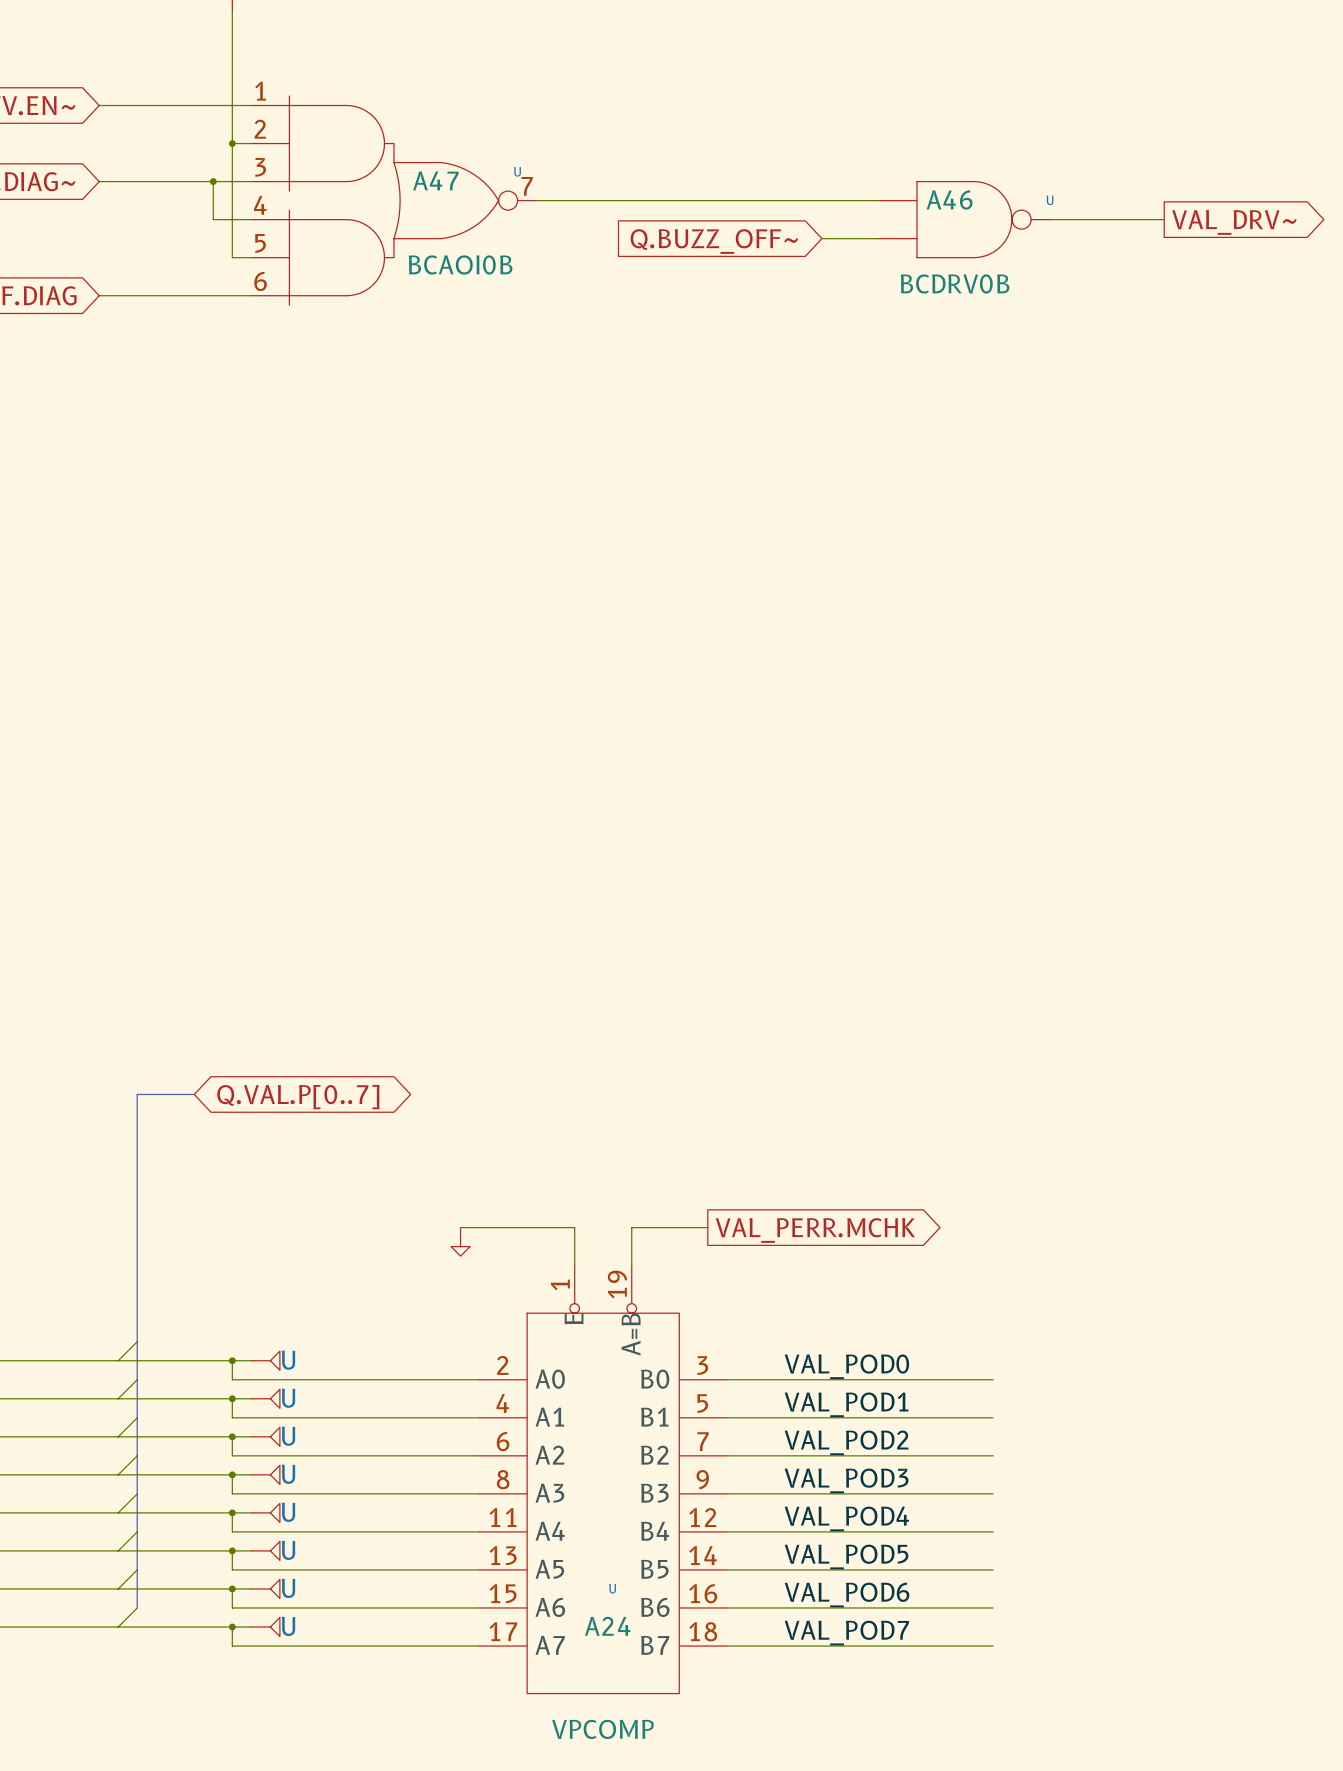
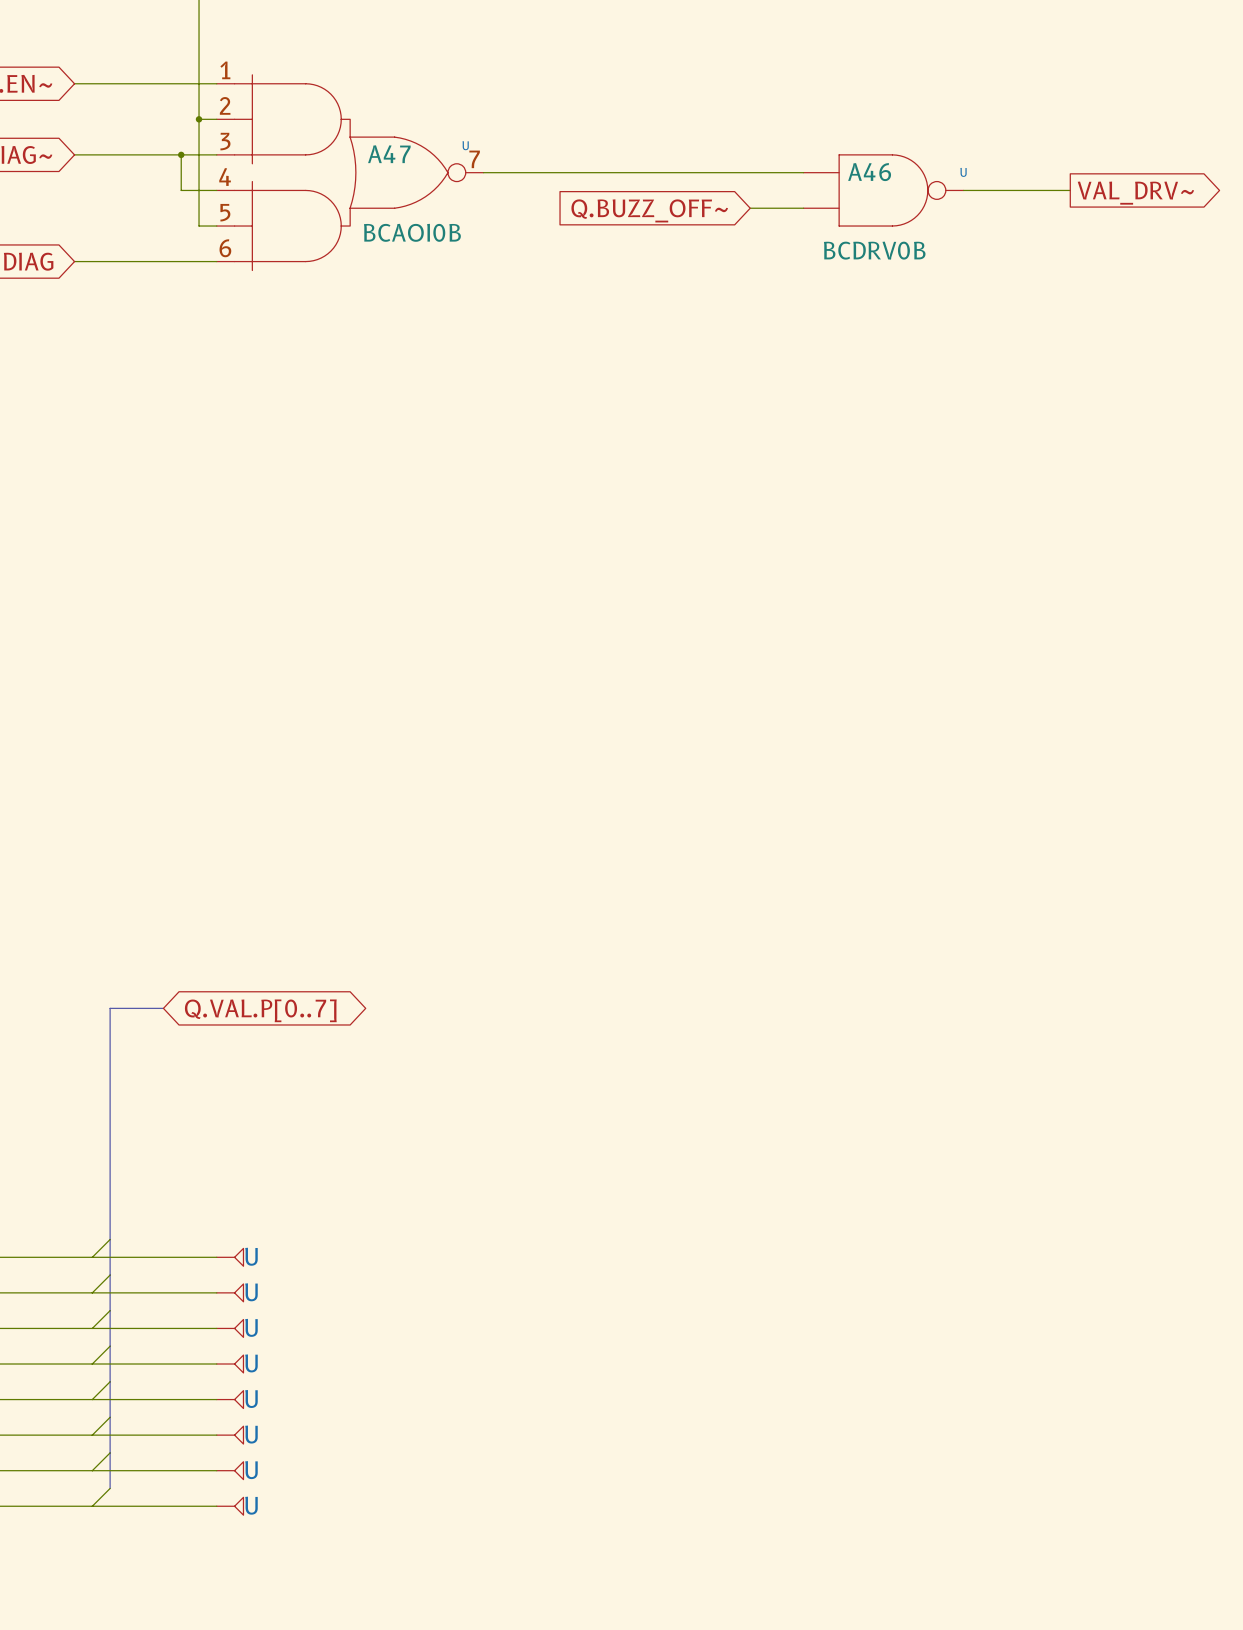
wire: (460, 1227) (574, 1227) (574, 1265) -> none
wire: (707, 1227) (631, 1227) (631, 1265) -> none
global label: VAL_PERR.MCHK (815, 1230) -> none
power symbol: (460, 1242) -> none
wire: (232, 1360) (232, 1379) (479, 1379) -> none
junction: (232, 1360) -> none
label: VAL_POD0 (846, 1366) -> none
wire: (726, 1379) (993, 1379) -> none
wire: (232, 1398) (232, 1417) (479, 1417) -> none
junction: (232, 1398) -> none
label: VAL_POD1 (846, 1404) -> none
wire: (726, 1417) (993, 1417) -> none
wire: (232, 1436) (232, 1455) (479, 1455) -> none
junction: (232, 1436) -> none
label: VAL_POD2 (846, 1442) -> none
wire: (726, 1455) (993, 1455) -> none
wire: (232, 1474) (232, 1493) (479, 1493) -> none
junction: (232, 1474) -> none
U: (603, 1479) -> none
label: VAL_POD3 (846, 1480) -> none
wire: (726, 1493) (993, 1493) -> none
wire: (232, 1512) (232, 1531) (479, 1531) -> none
junction: (232, 1512) -> none
label: VAL_POD4 (846, 1518) -> none
wire: (726, 1531) (993, 1531) -> none
wire: (232, 1550) (232, 1569) (479, 1569) -> none
junction: (232, 1550) -> none
label: VAL_POD5 (846, 1556) -> none
wire: (726, 1569) (993, 1569) -> none
wire: (232, 1588) (232, 1607) (479, 1607) -> none
junction: (232, 1588) -> none
label: VAL_POD6 (847, 1595) -> none
wire: (726, 1607) (993, 1607) -> none
wire: (232, 1627) (232, 1646) (479, 1646) -> none
junction: (232, 1627) -> none
label: VAL_POD7 (846, 1633) -> none
wire: (726, 1646) (993, 1646) -> none

